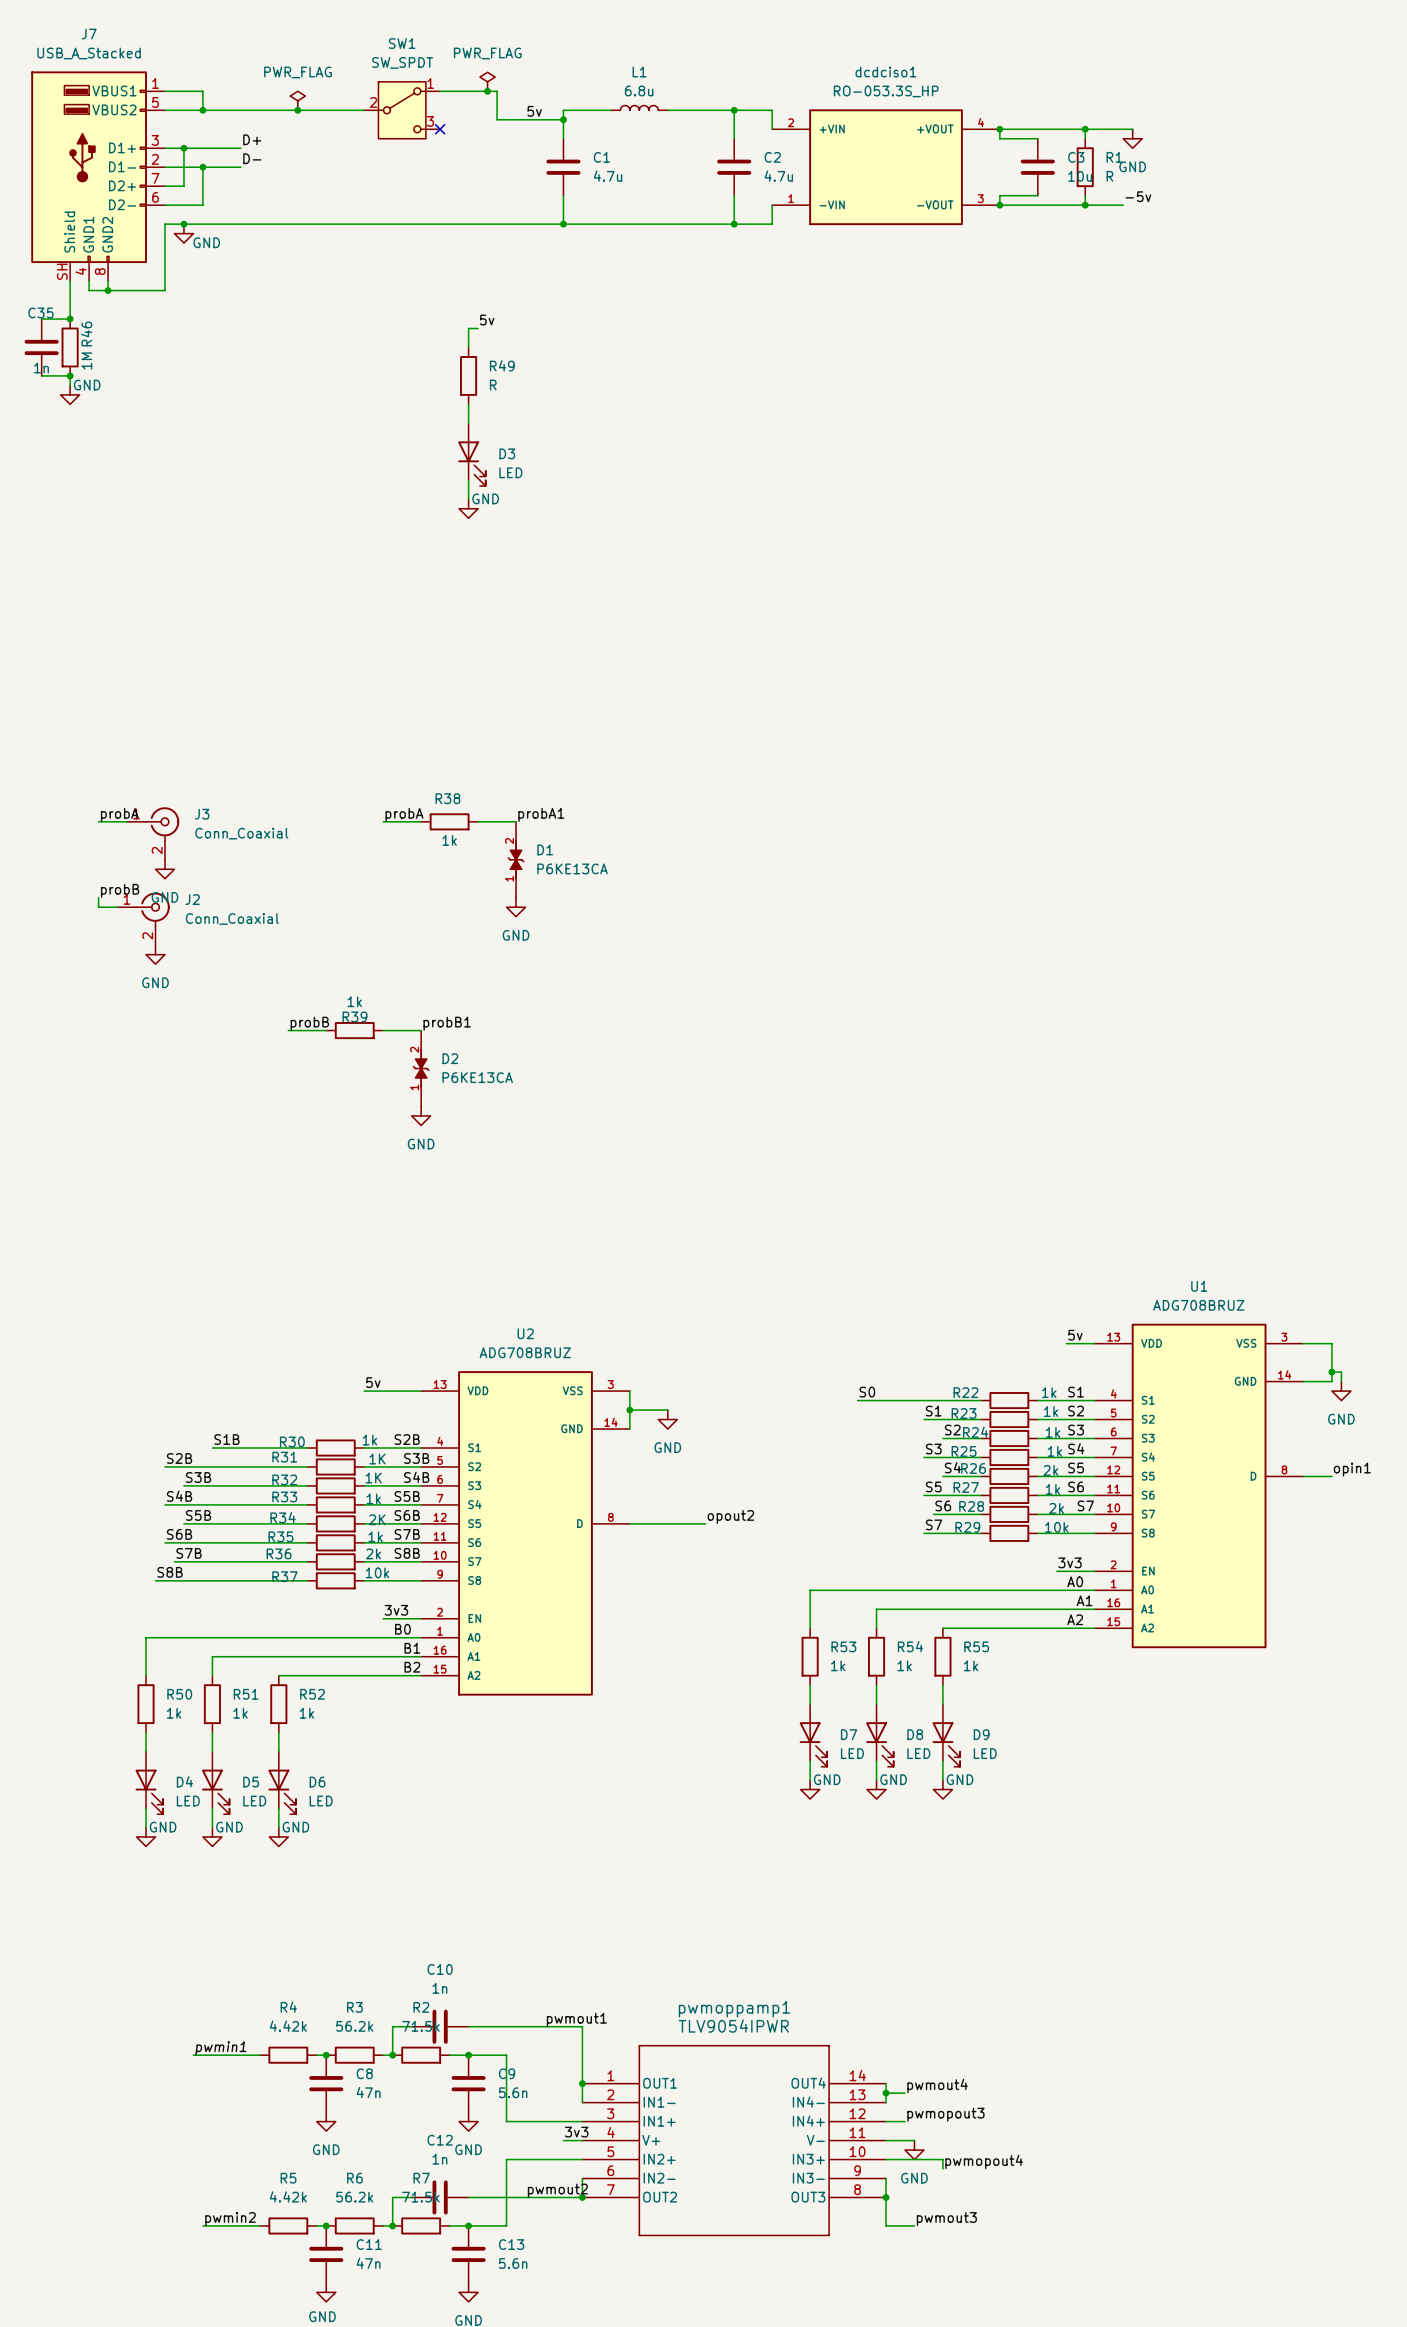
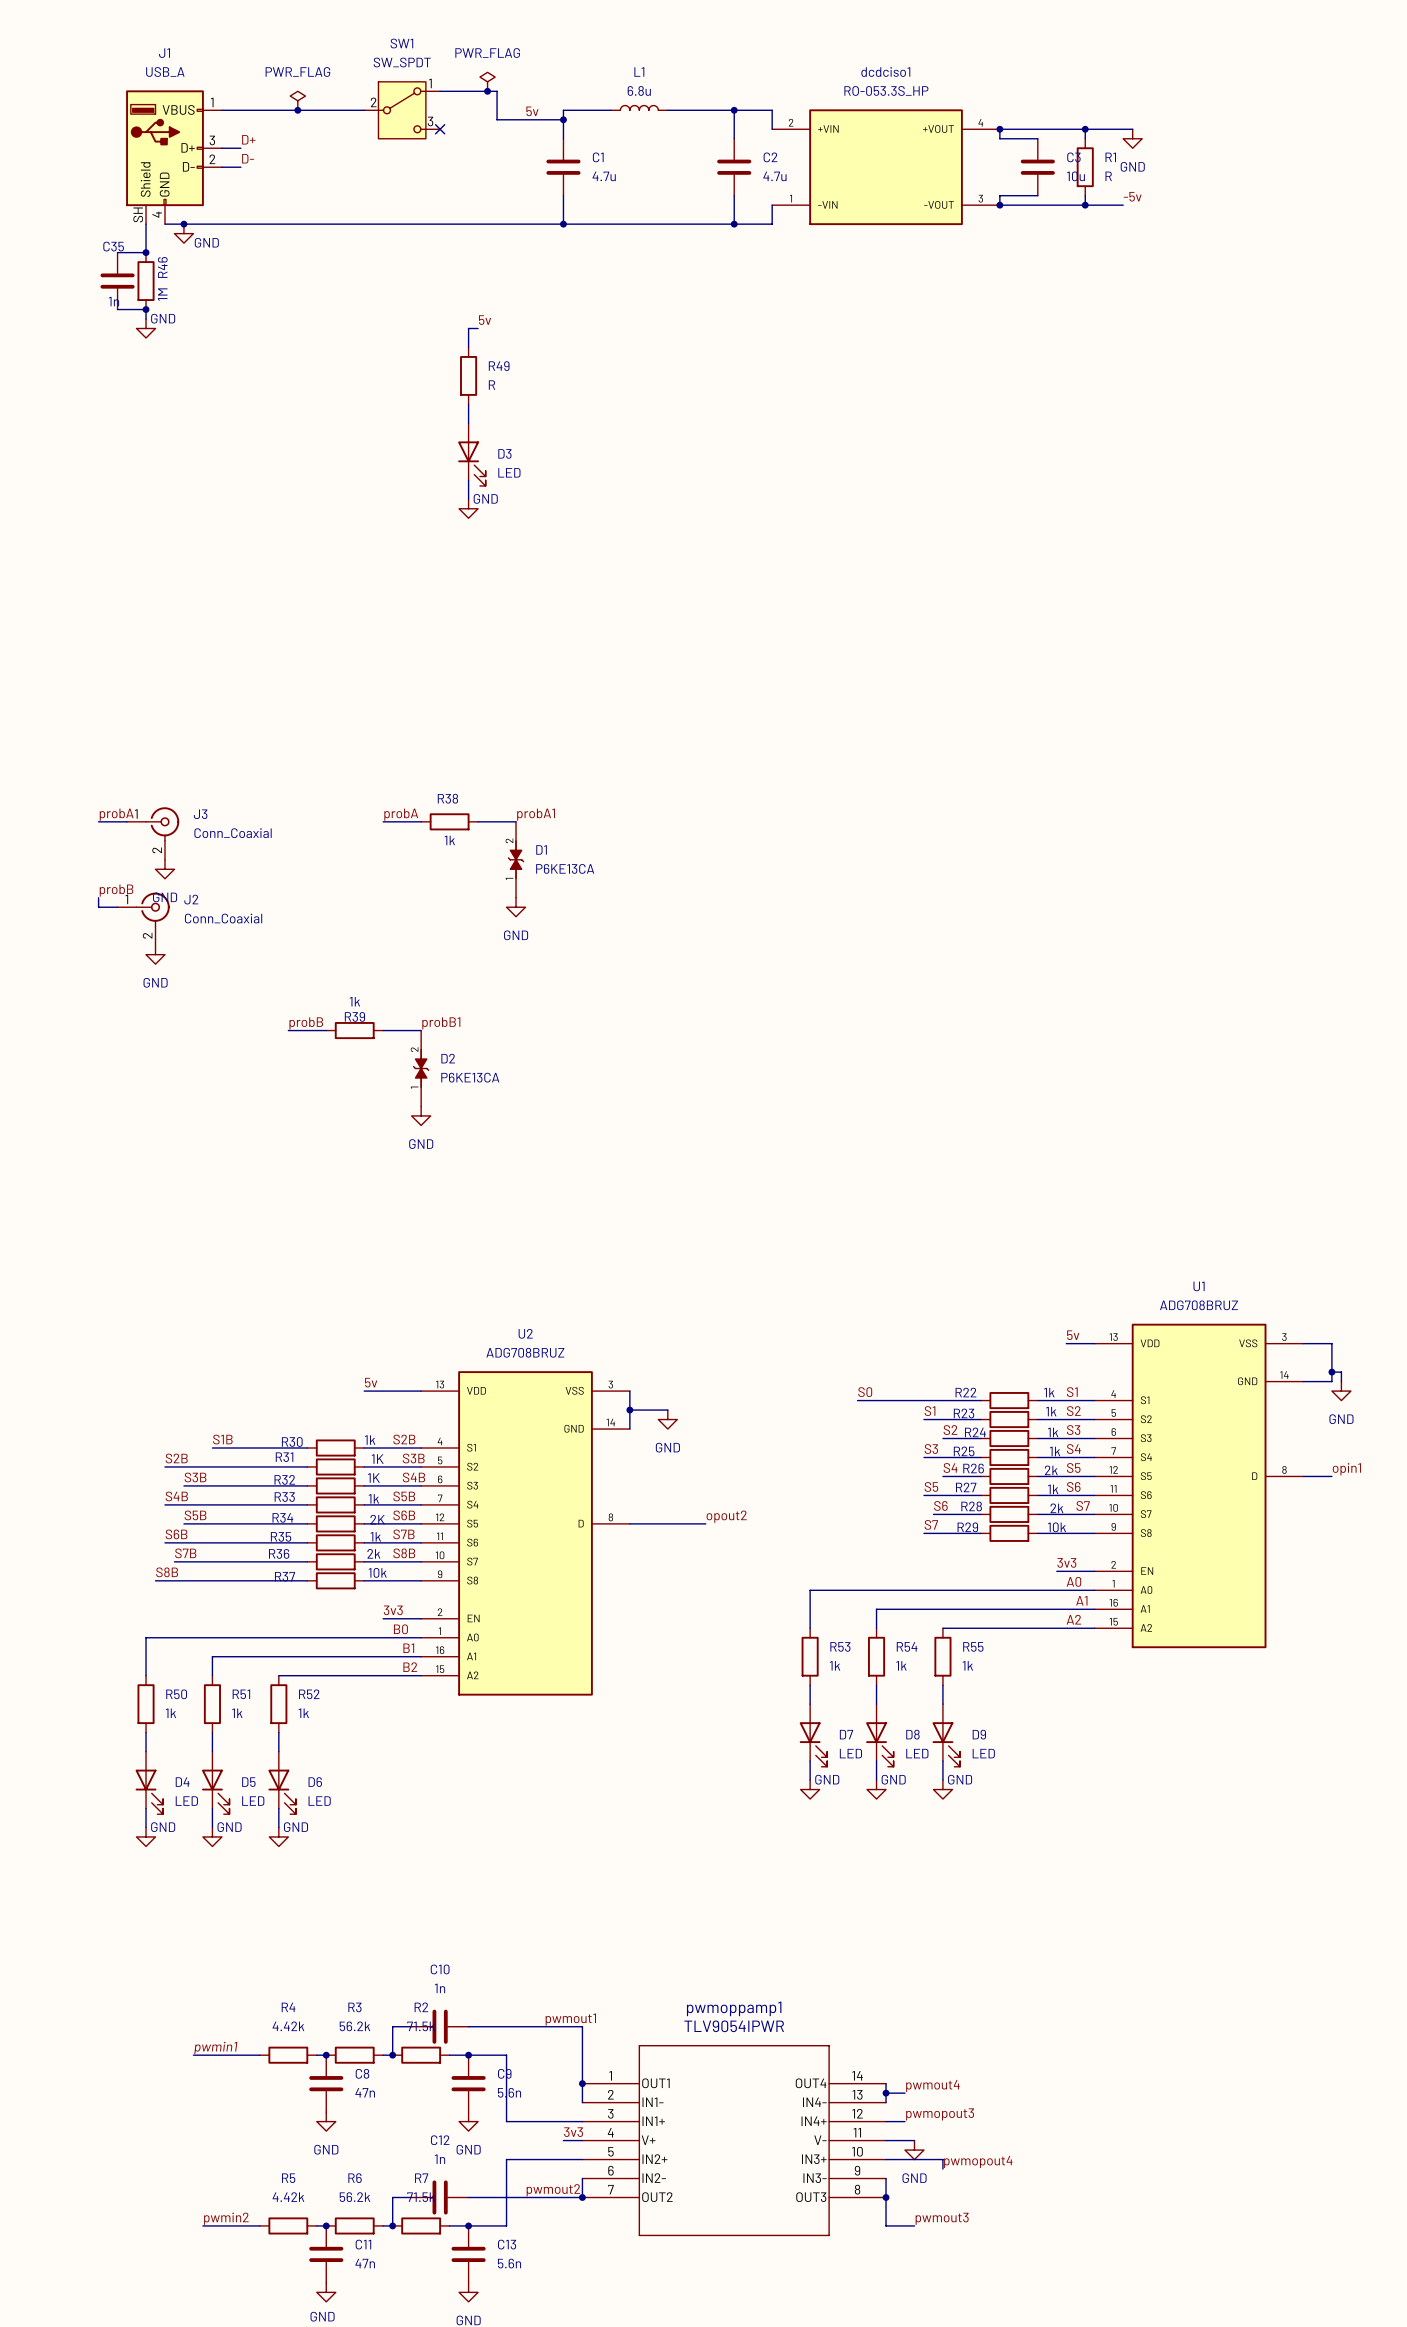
junction: (202, 110) -> none
junction: (183, 148) -> none
J1: none -> USB_A (174, 157)
junction: (202, 167) -> none
J7: USB_A_Stacked (98, 176) -> none
wire: (164, 224) (164, 290) (89, 290) (89, 281) -> none
junction: none -> (146, 252)
wire: (70, 281) (70, 319) (41, 319) -> none
wire: (108, 281) (108, 290) -> none
junction: (108, 290) -> none
junction: none -> (146, 309)
junction: (70, 319) -> none
C35 position: (41, 347) -> (117, 281)
R46 position: (70, 347) -> (146, 281)
wire: (41, 375) (70, 375) (70, 385) -> (117, 309) (146, 309) (146, 319)
junction: (70, 375) -> none
power symbol position: GND (70, 394) -> GND (146, 328)

